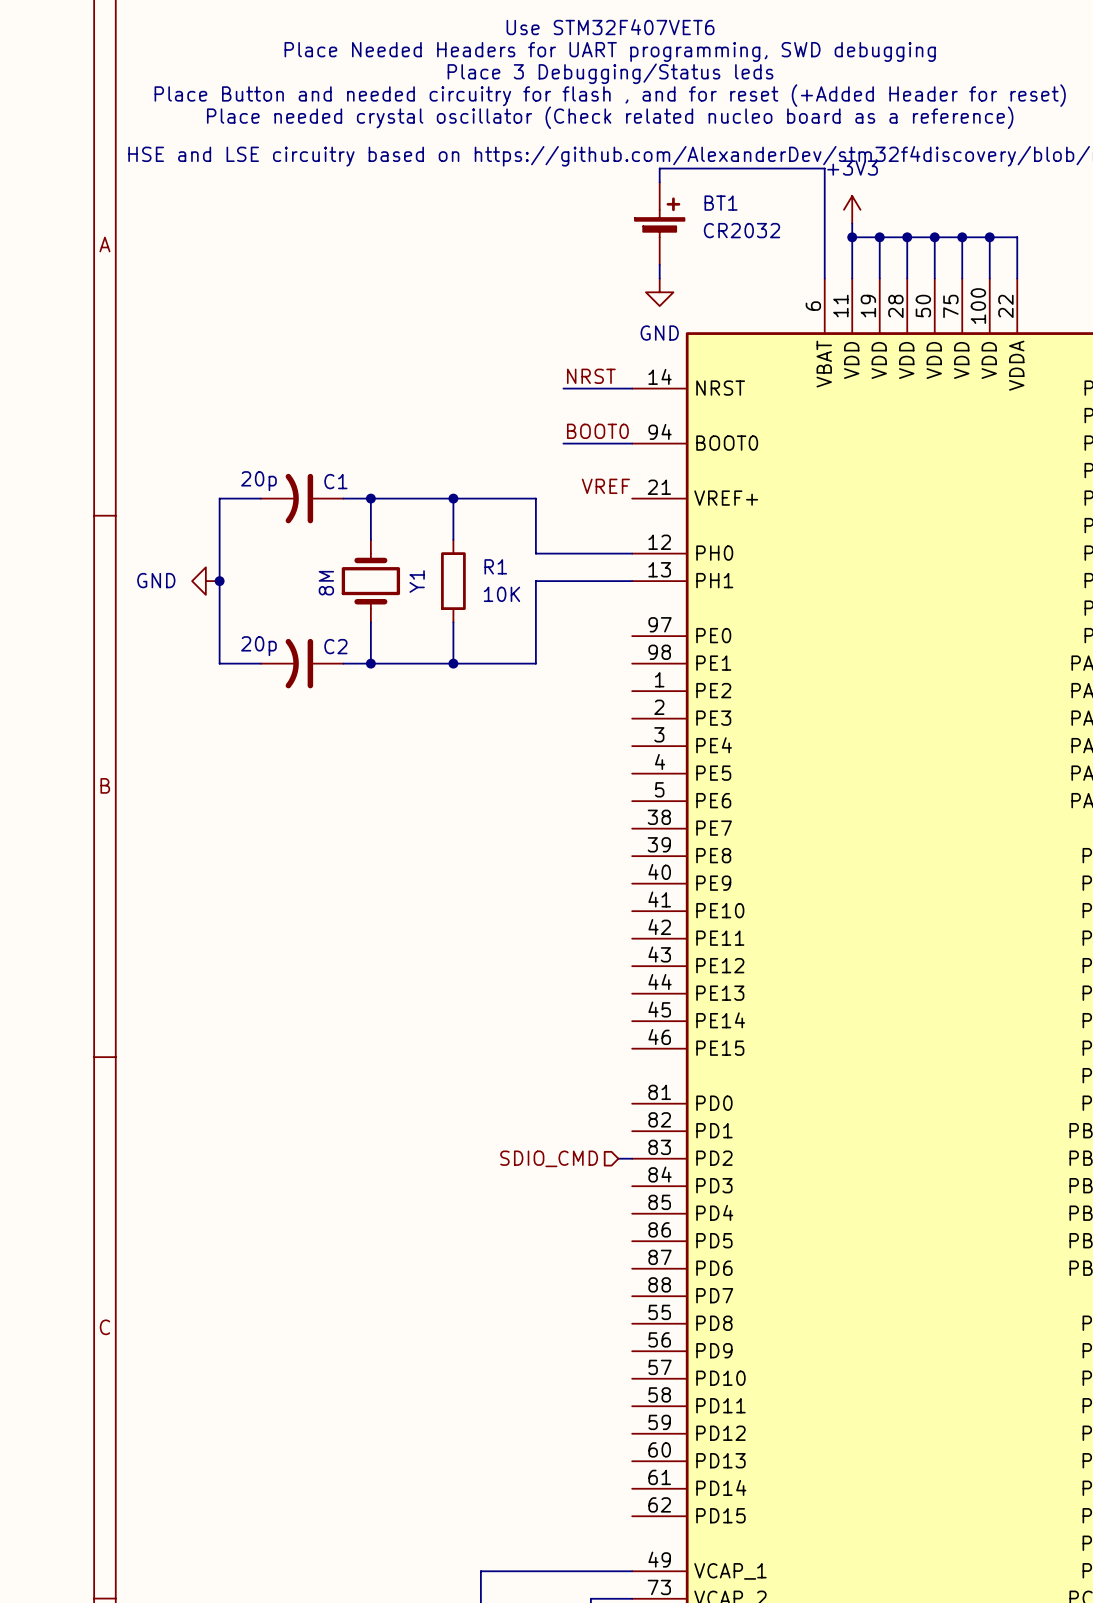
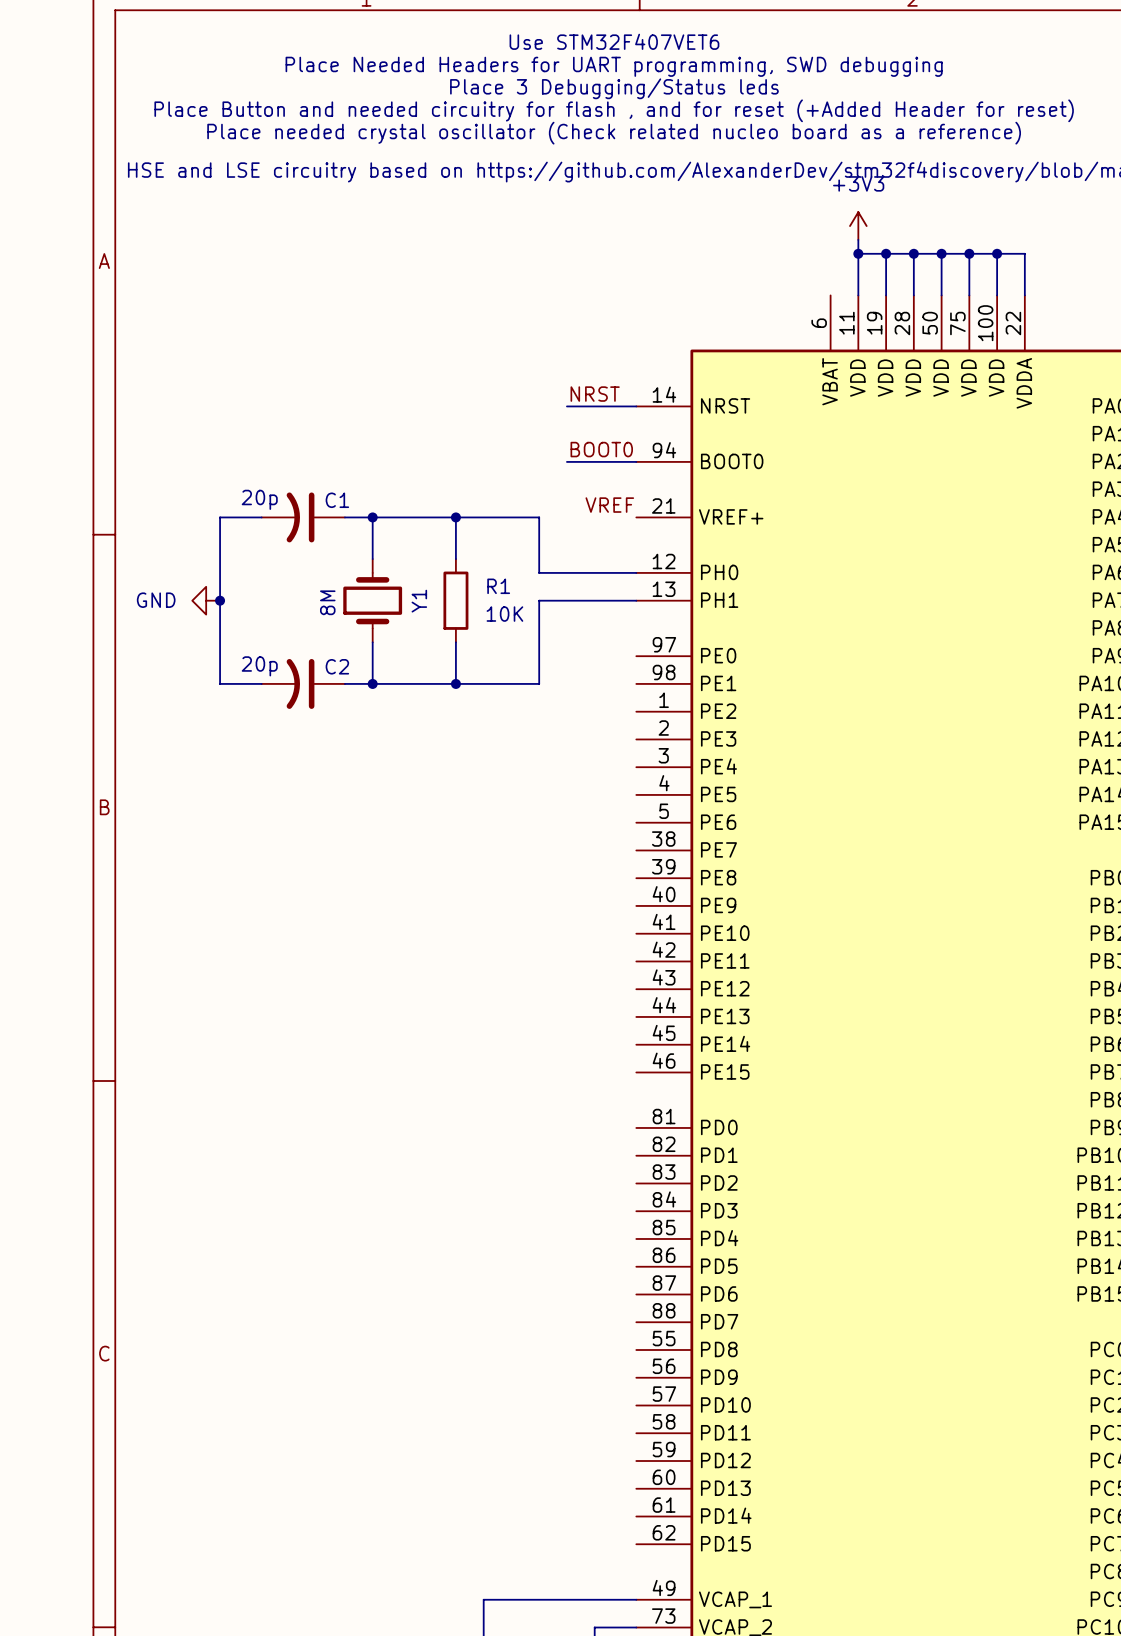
wire: (659, 182) (659, 168) (824, 168) (824, 278) -> none
BT1: CR2032 (659, 223) -> none
wire: (659, 264) (659, 278) -> none
power symbol: GND (659, 292) -> none
hierarchical label: SDIO_CMD (549, 1158) -> none
wire: (618, 1158) (632, 1158) -> none

